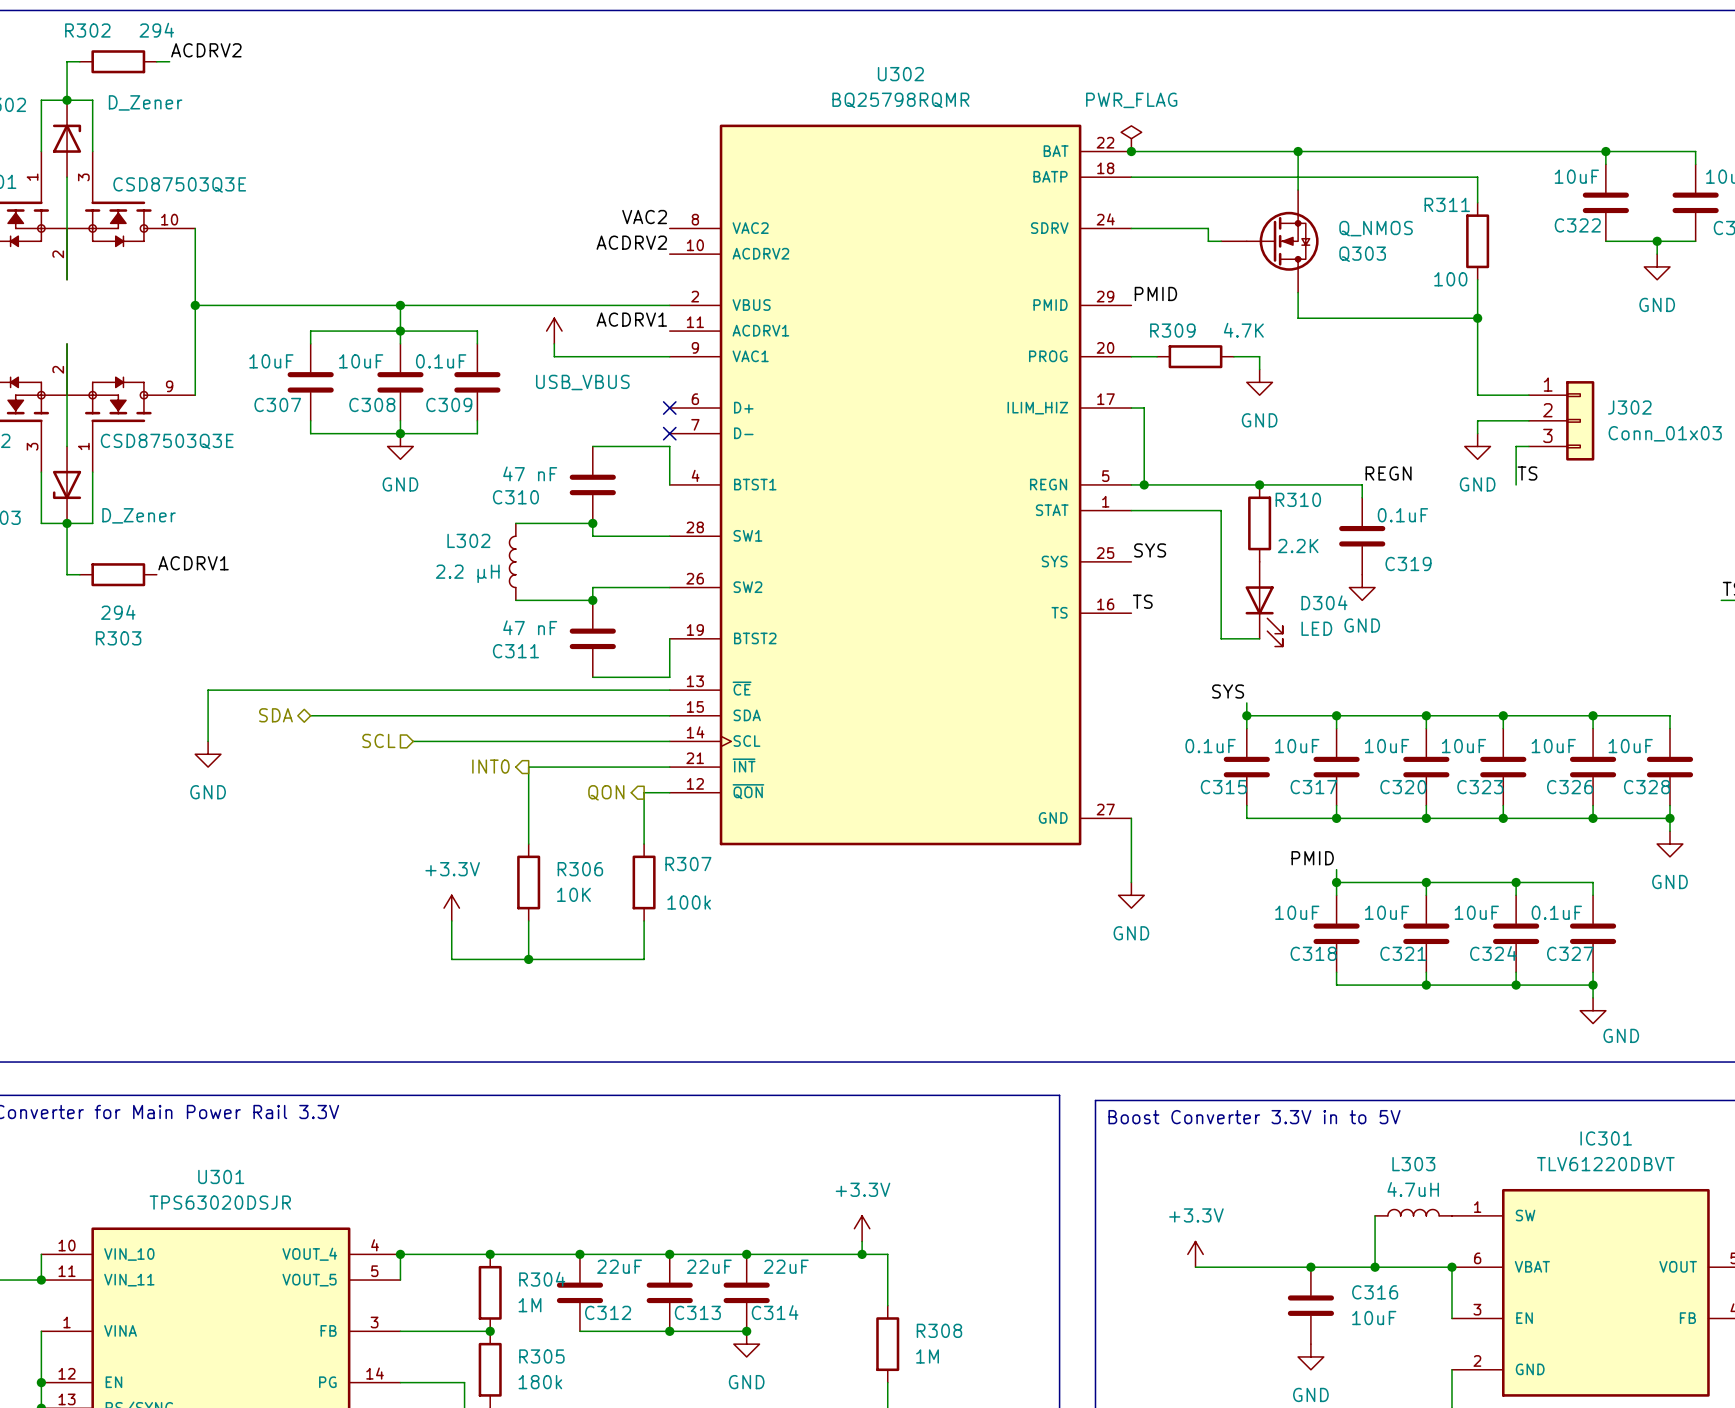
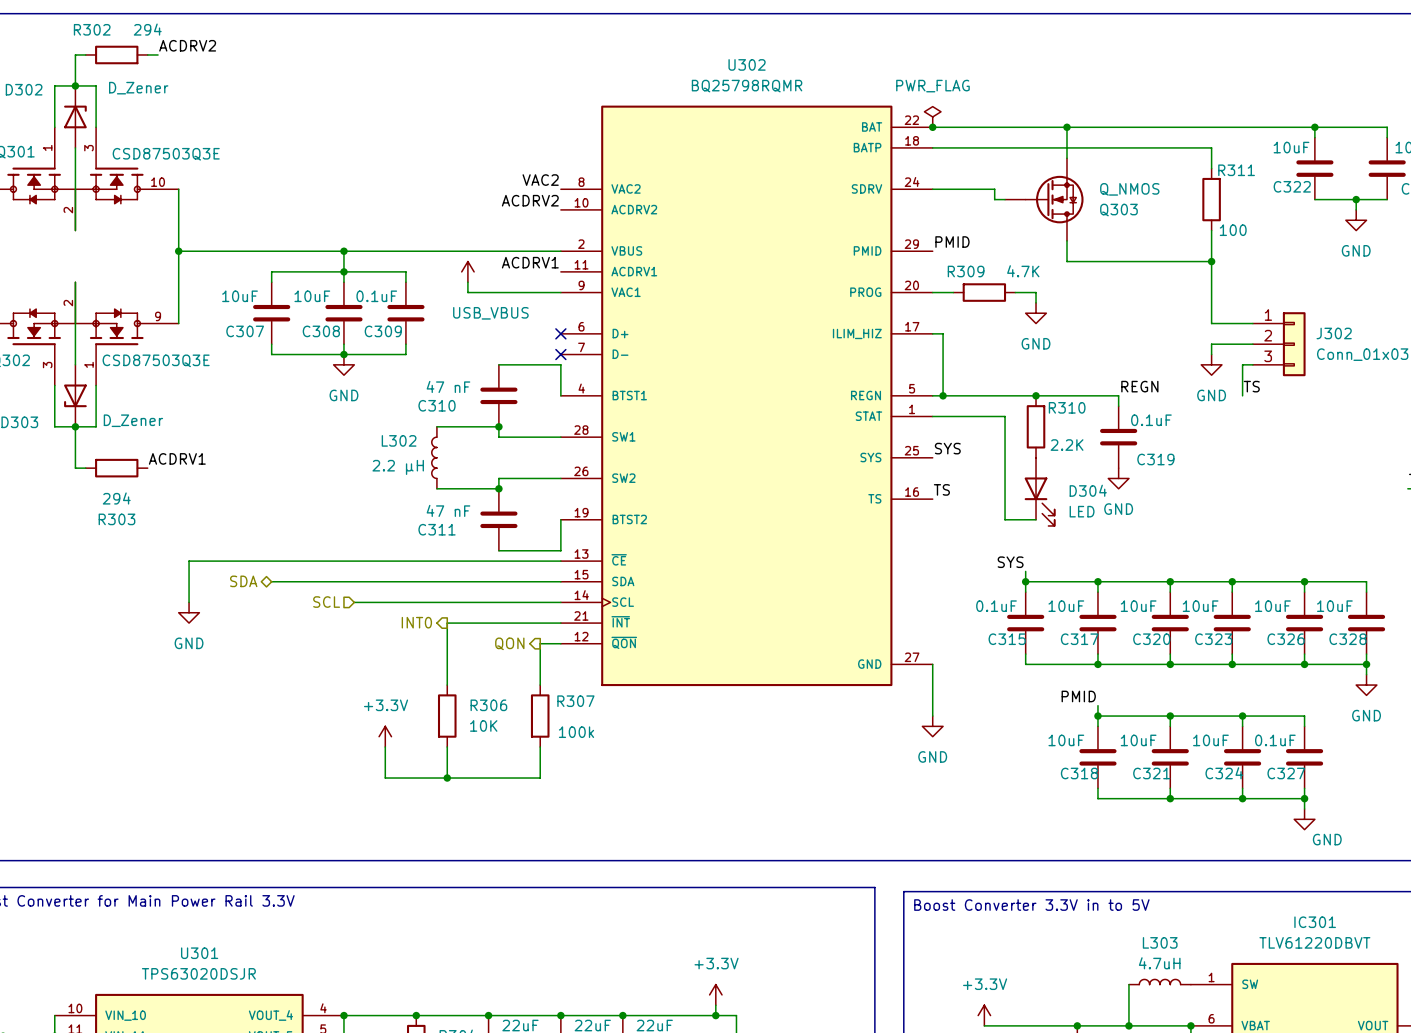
R311 name position: R311 (1447, 204) -> R311 (1236, 170)
R311 value position: 100 (1450, 279) -> 100 (1233, 230)

